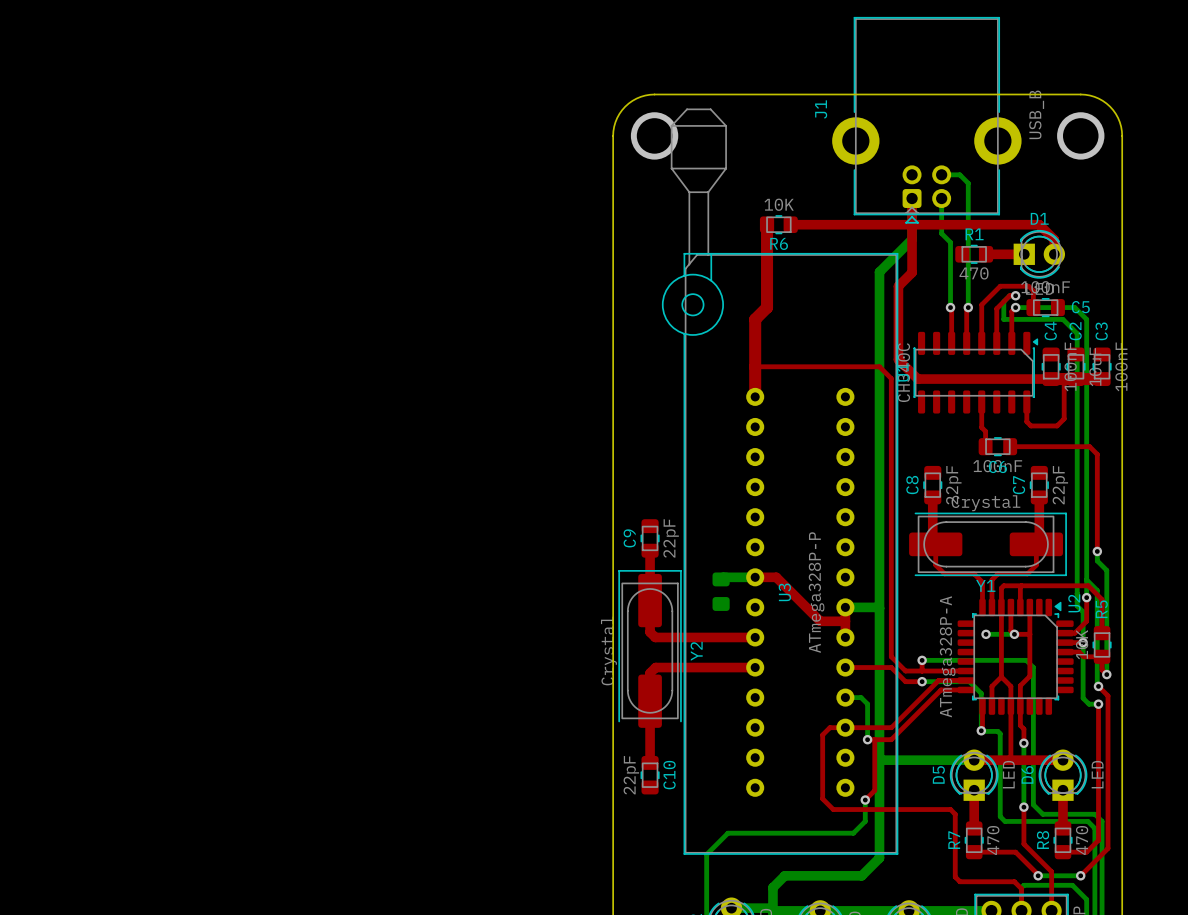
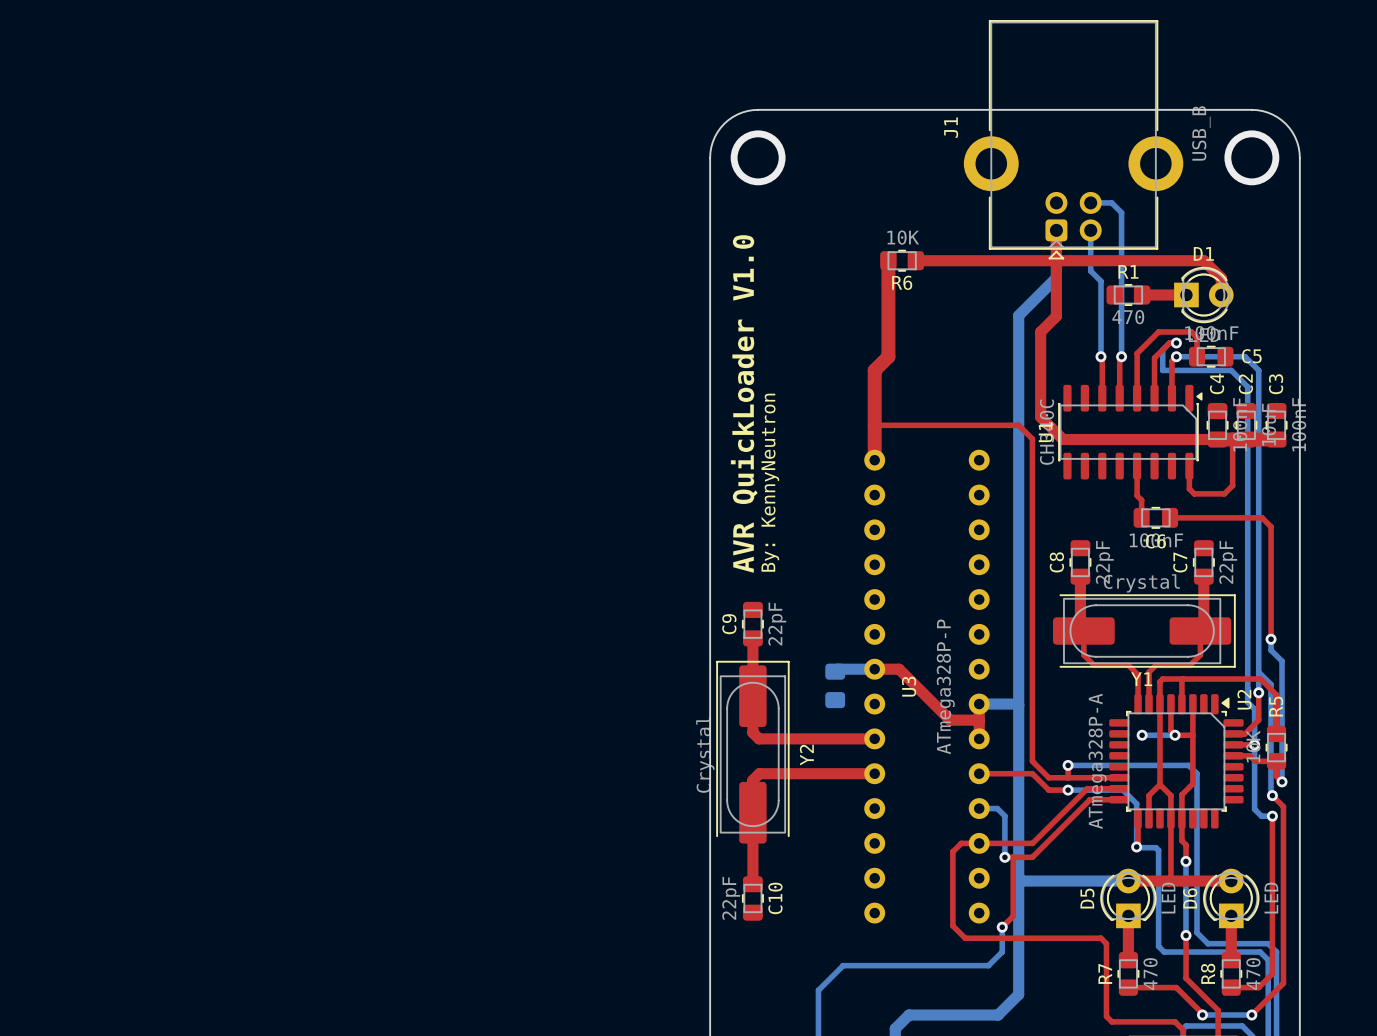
U3 footprint: [662, 108, 899, 855] -> [864, 449, 990, 924]
text: none -> AVR QuickLoader V1.0 (744, 403)
text: none -> By: KennyNeutron (770, 482)

